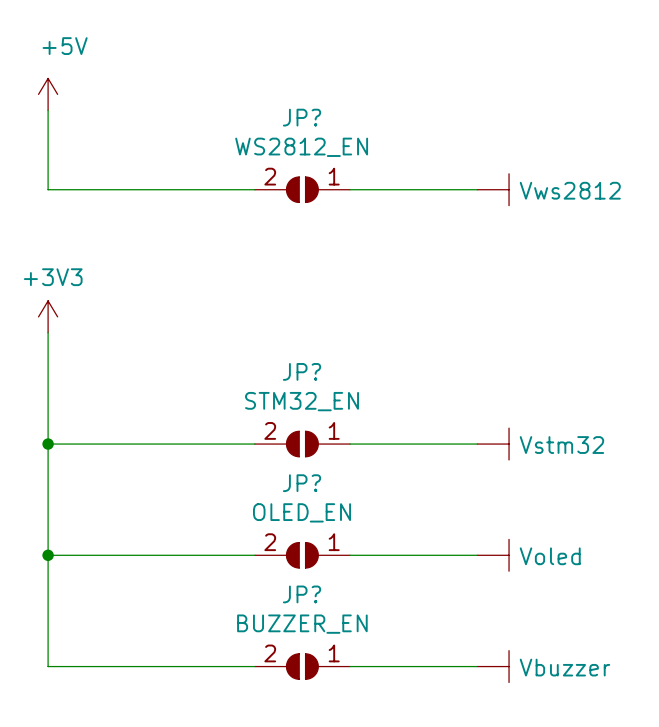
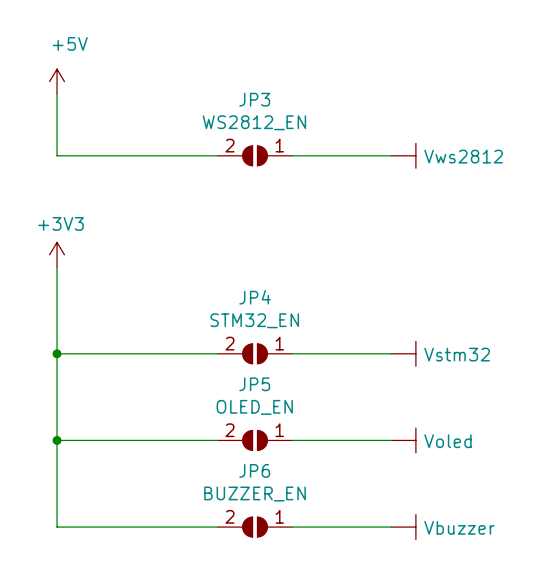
JP? name: JP? (302, 117) -> JP3 (254, 99)
JP? name: JP? (302, 371) -> JP4 (255, 297)
JP? name: JP? (302, 483) -> JP5 (254, 384)
JP? name: JP? (302, 594) -> JP6 (254, 470)

